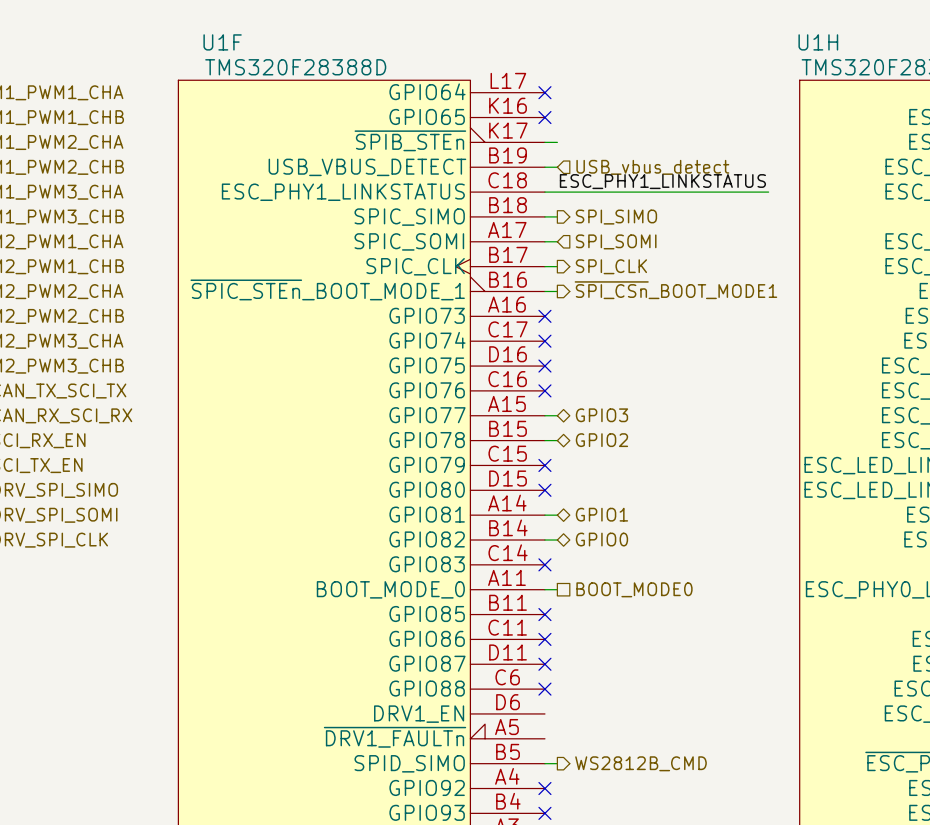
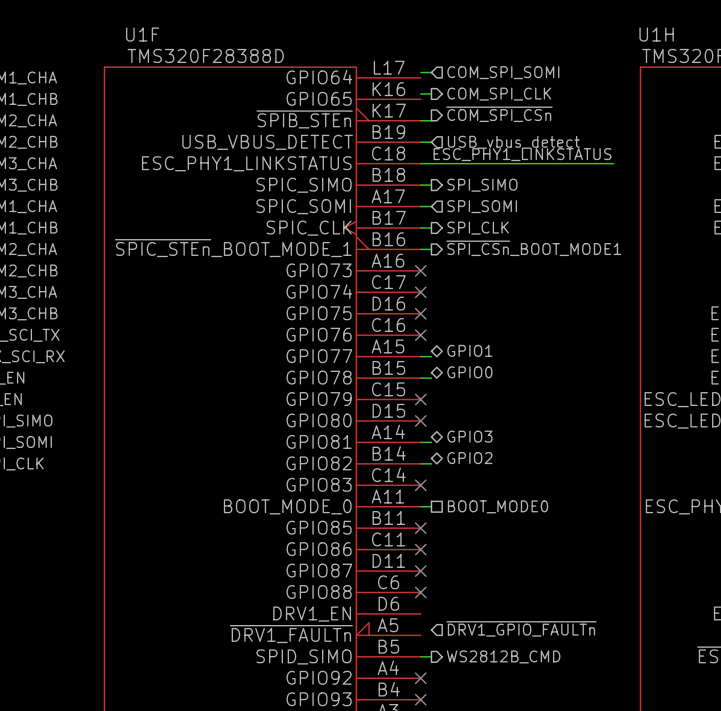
wire: none -> (420, 72) (431, 72)
hierarchical label: none -> COM_SPI_SOMI (503, 72)
no-connect mark: (544, 92) -> none
wire: none -> (420, 93) (431, 93)
hierarchical label: none -> COM_SPI_CLK (499, 94)
no-connect mark: (544, 117) -> none
hierarchical label: none -> ~{COM_SPI_CSn} (499, 114)
hierarchical label position: GPIO3 (601, 415) -> GPIO3 (469, 436)
hierarchical label position: GPIO2 (601, 440) -> GPIO2 (469, 458)
hierarchical label position: GPIO1 (601, 514) -> GPIO1 (469, 350)
hierarchical label position: GPIO0 (601, 539) -> GPIO0 (469, 372)
hierarchical label: none -> ~{DRV1_GPIO_FAULTn} (521, 628)

